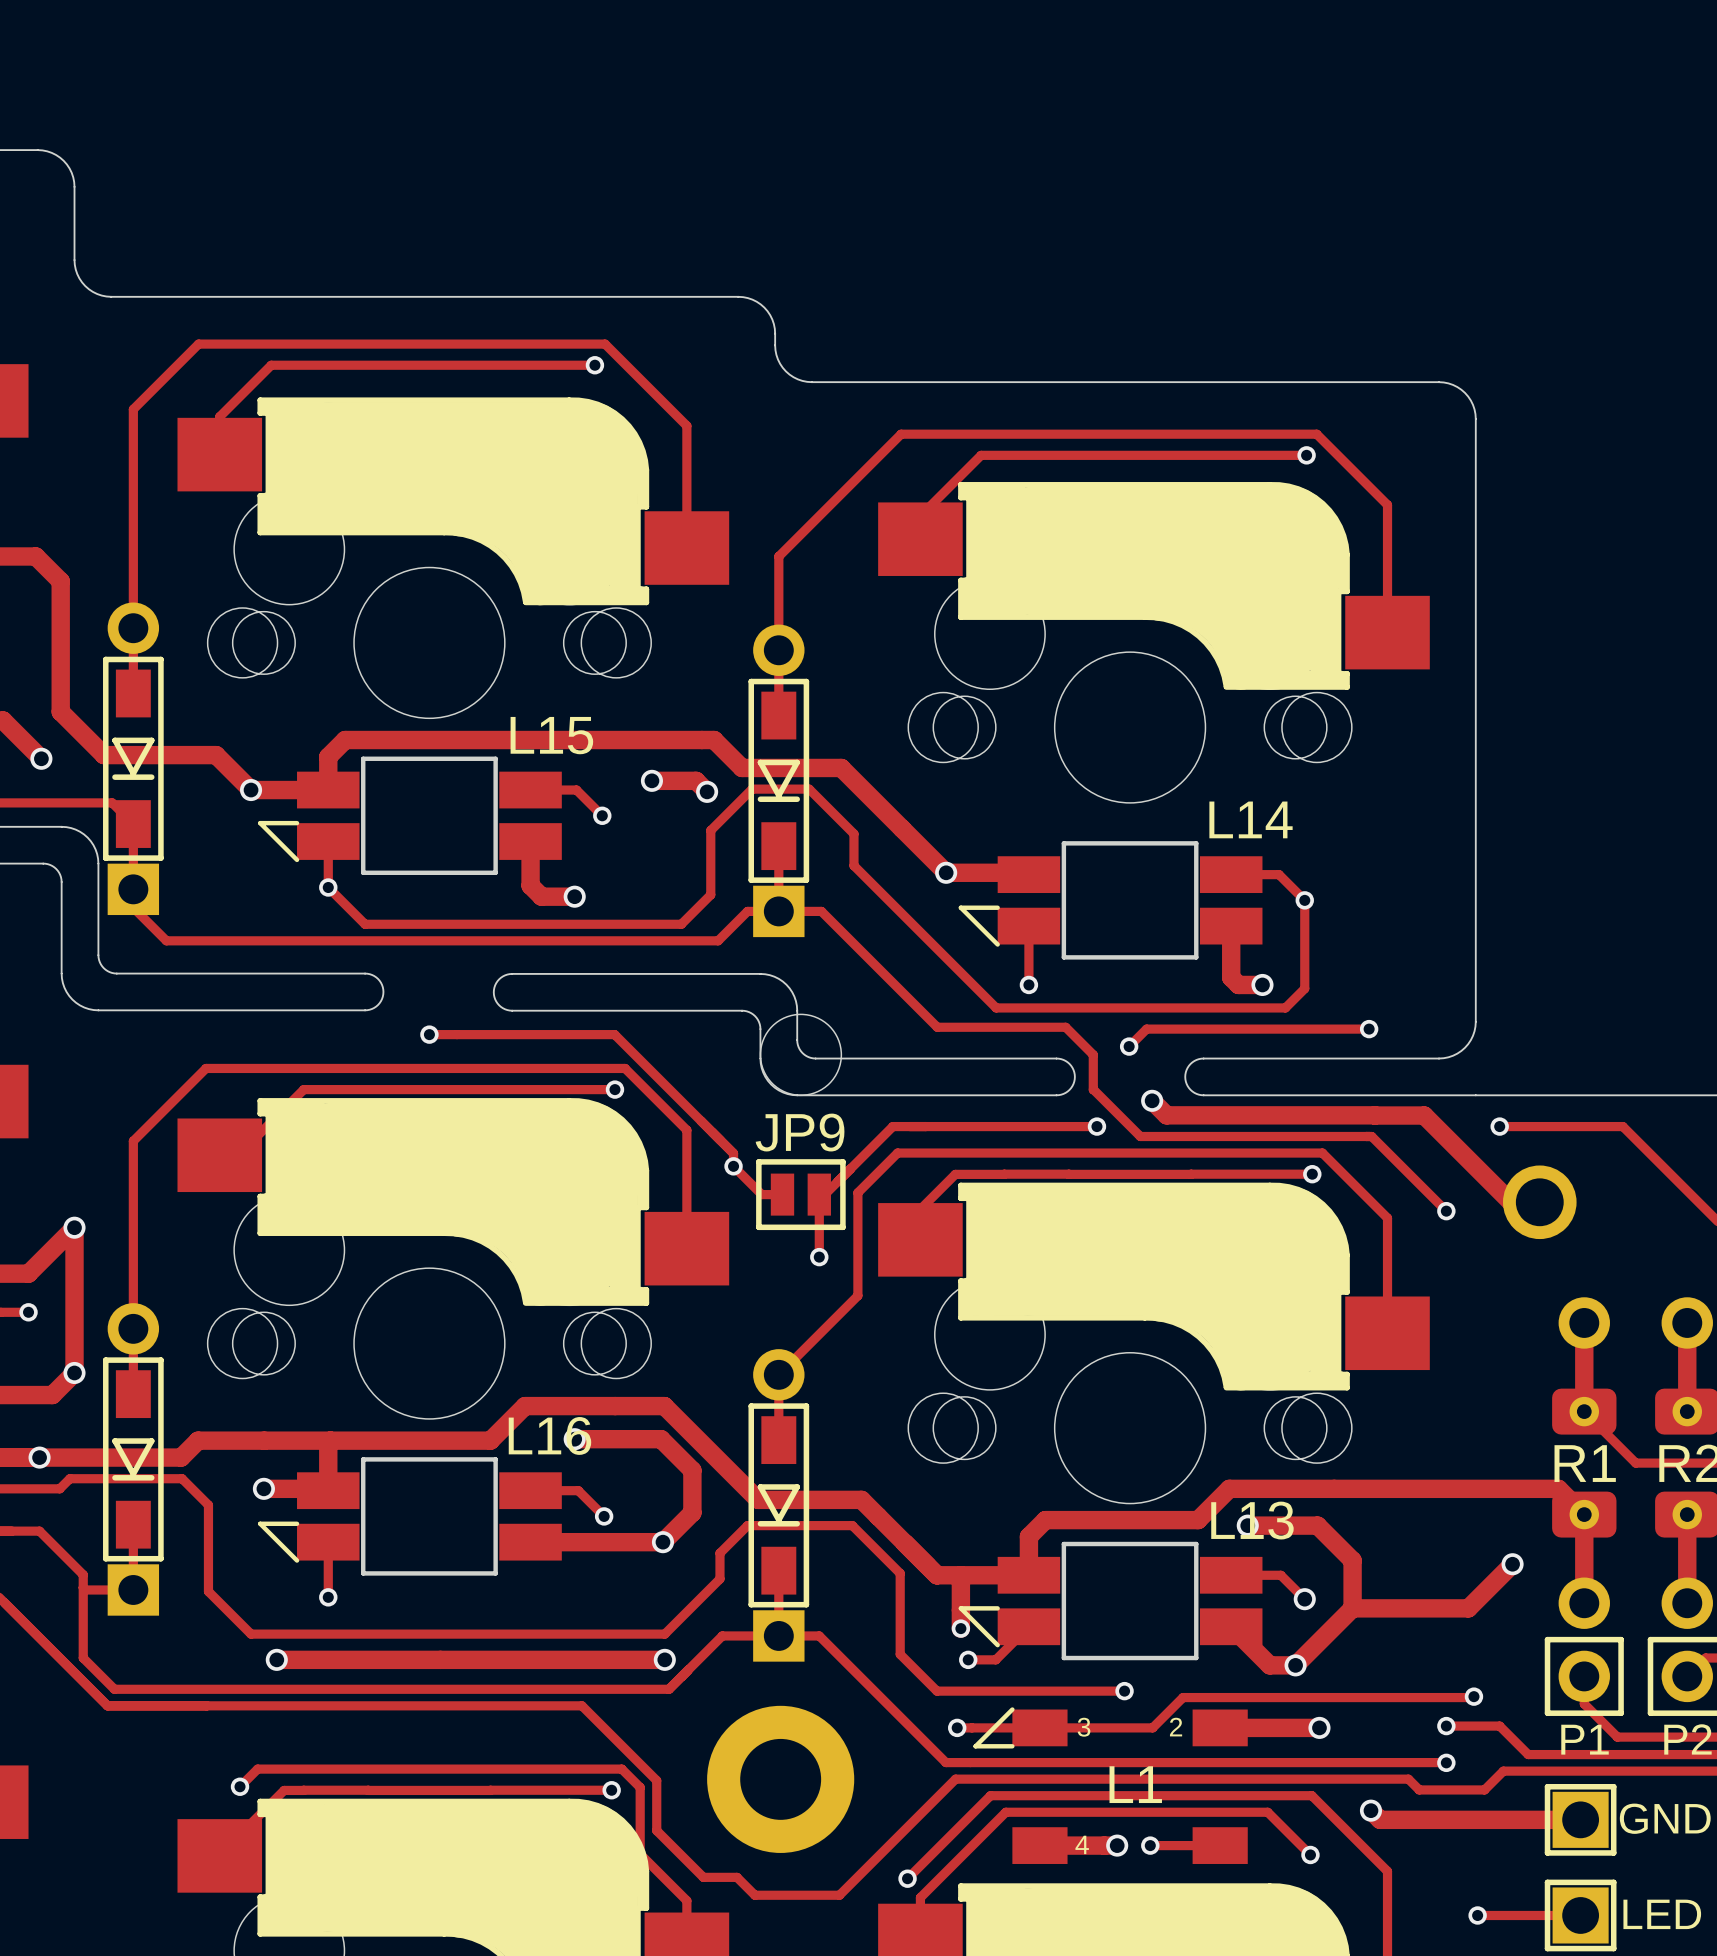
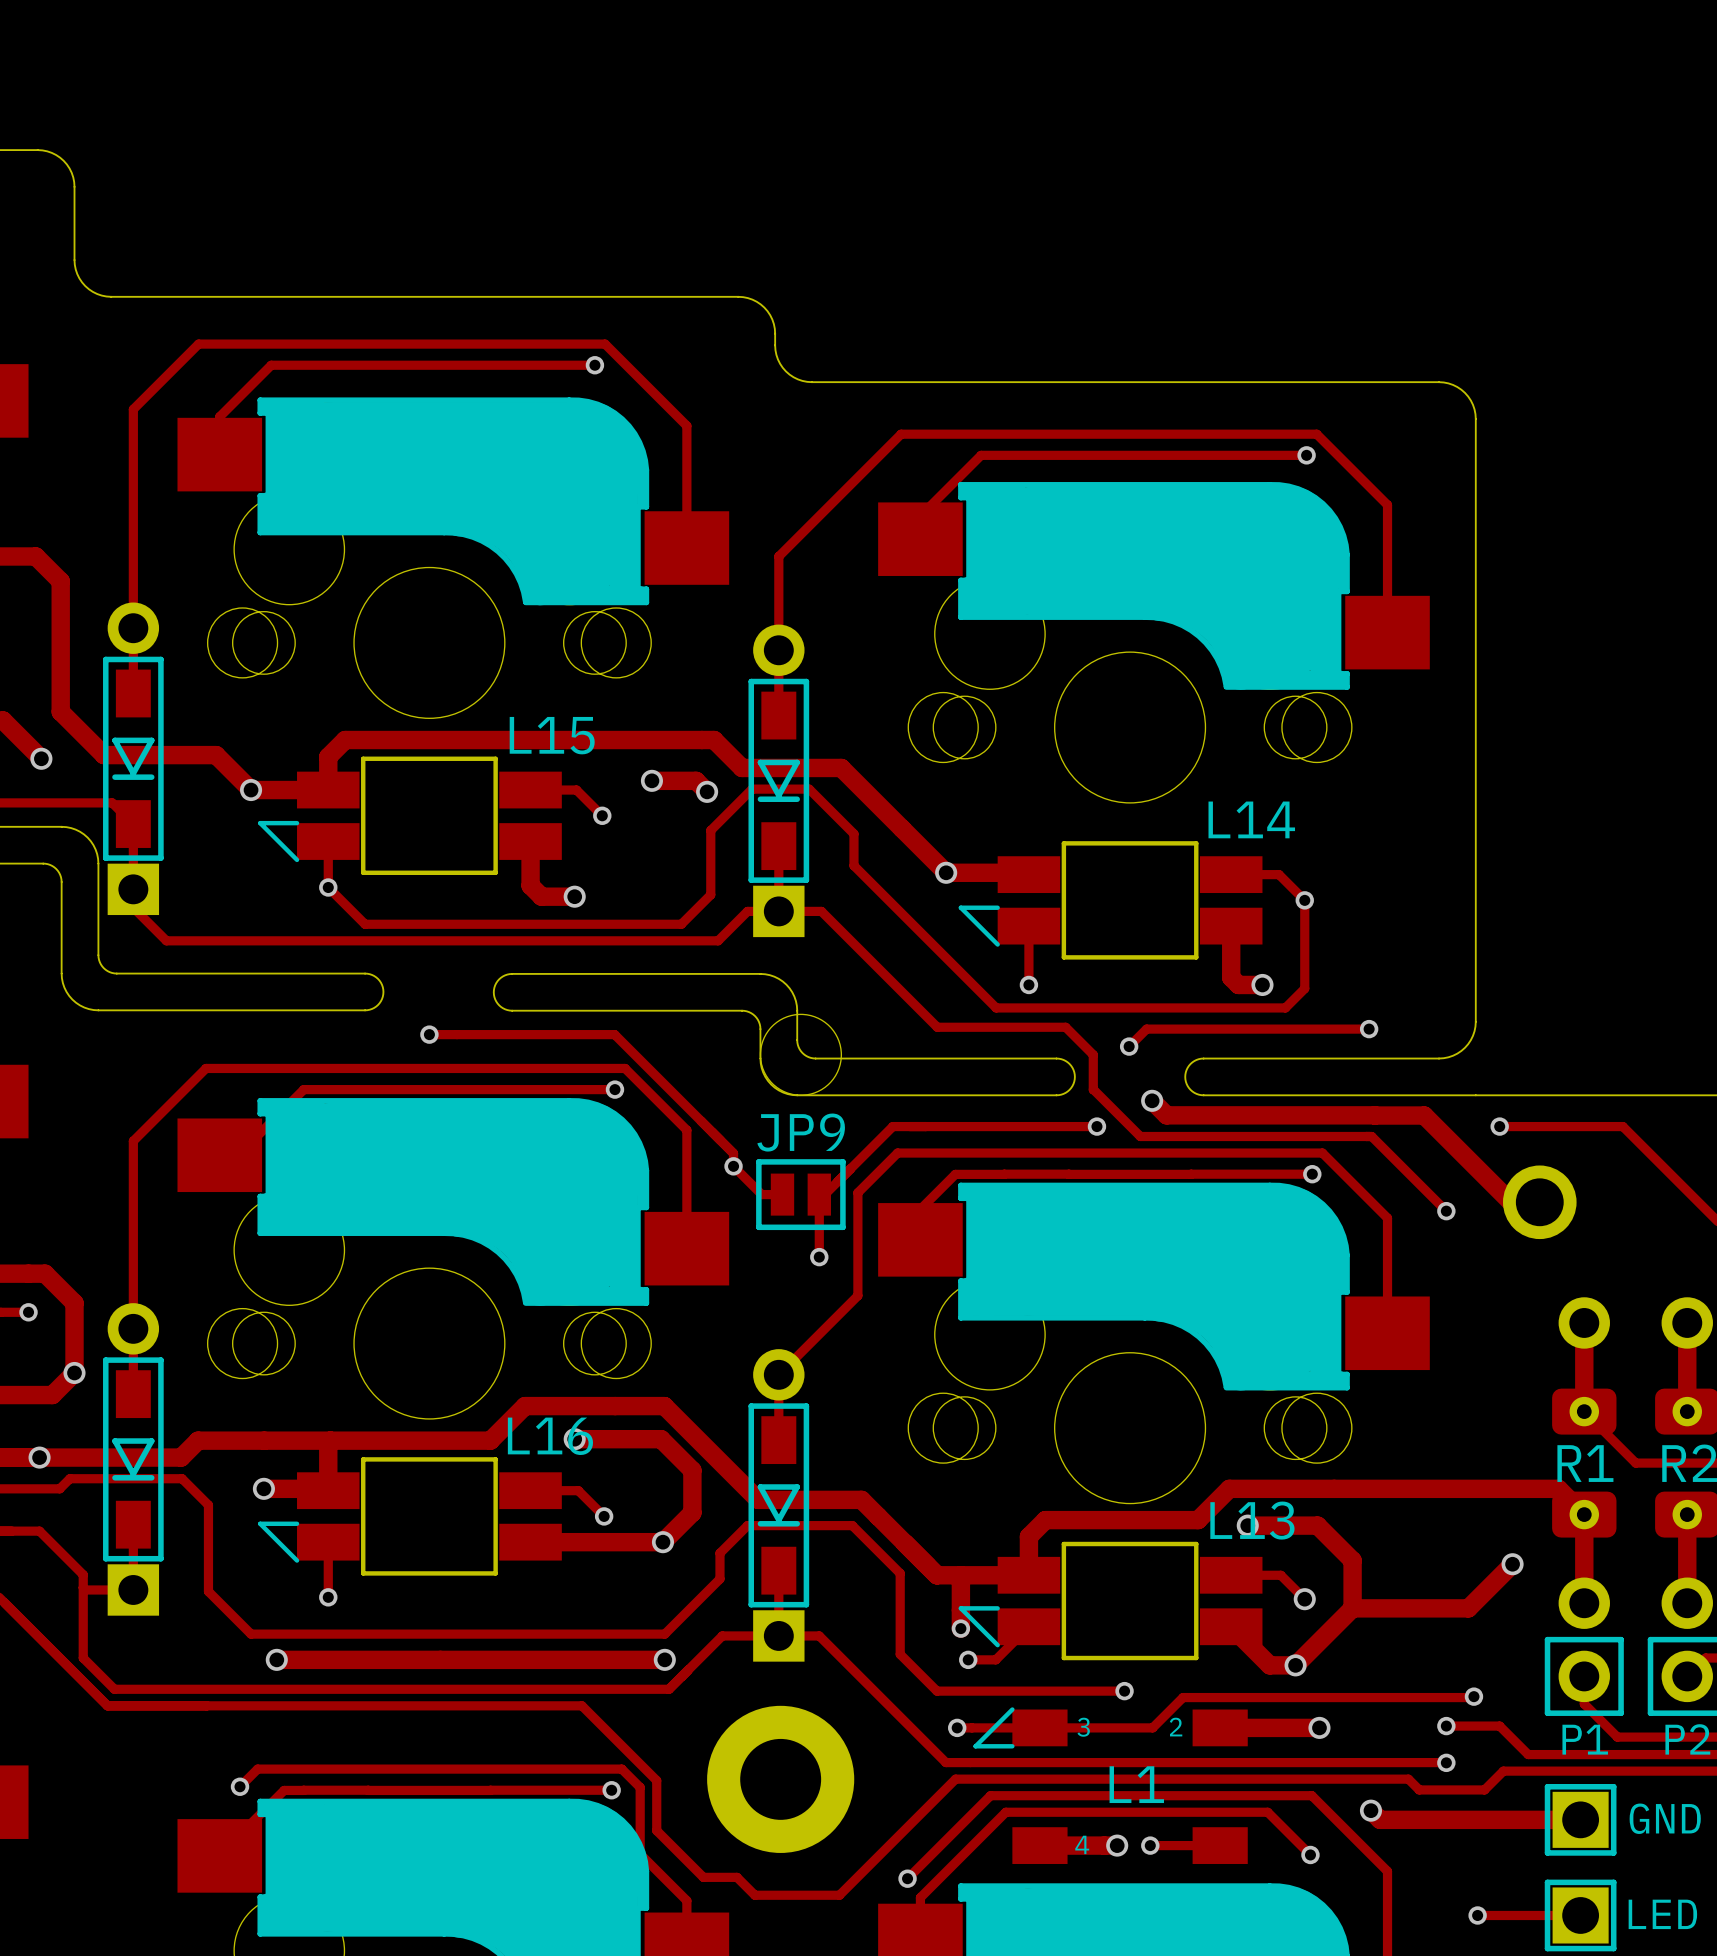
via: (74, 1227) -> none
track: (28, 1273) (74, 1227) (74, 1303) -> (28, 1273) (45, 1273) (74, 1303)

